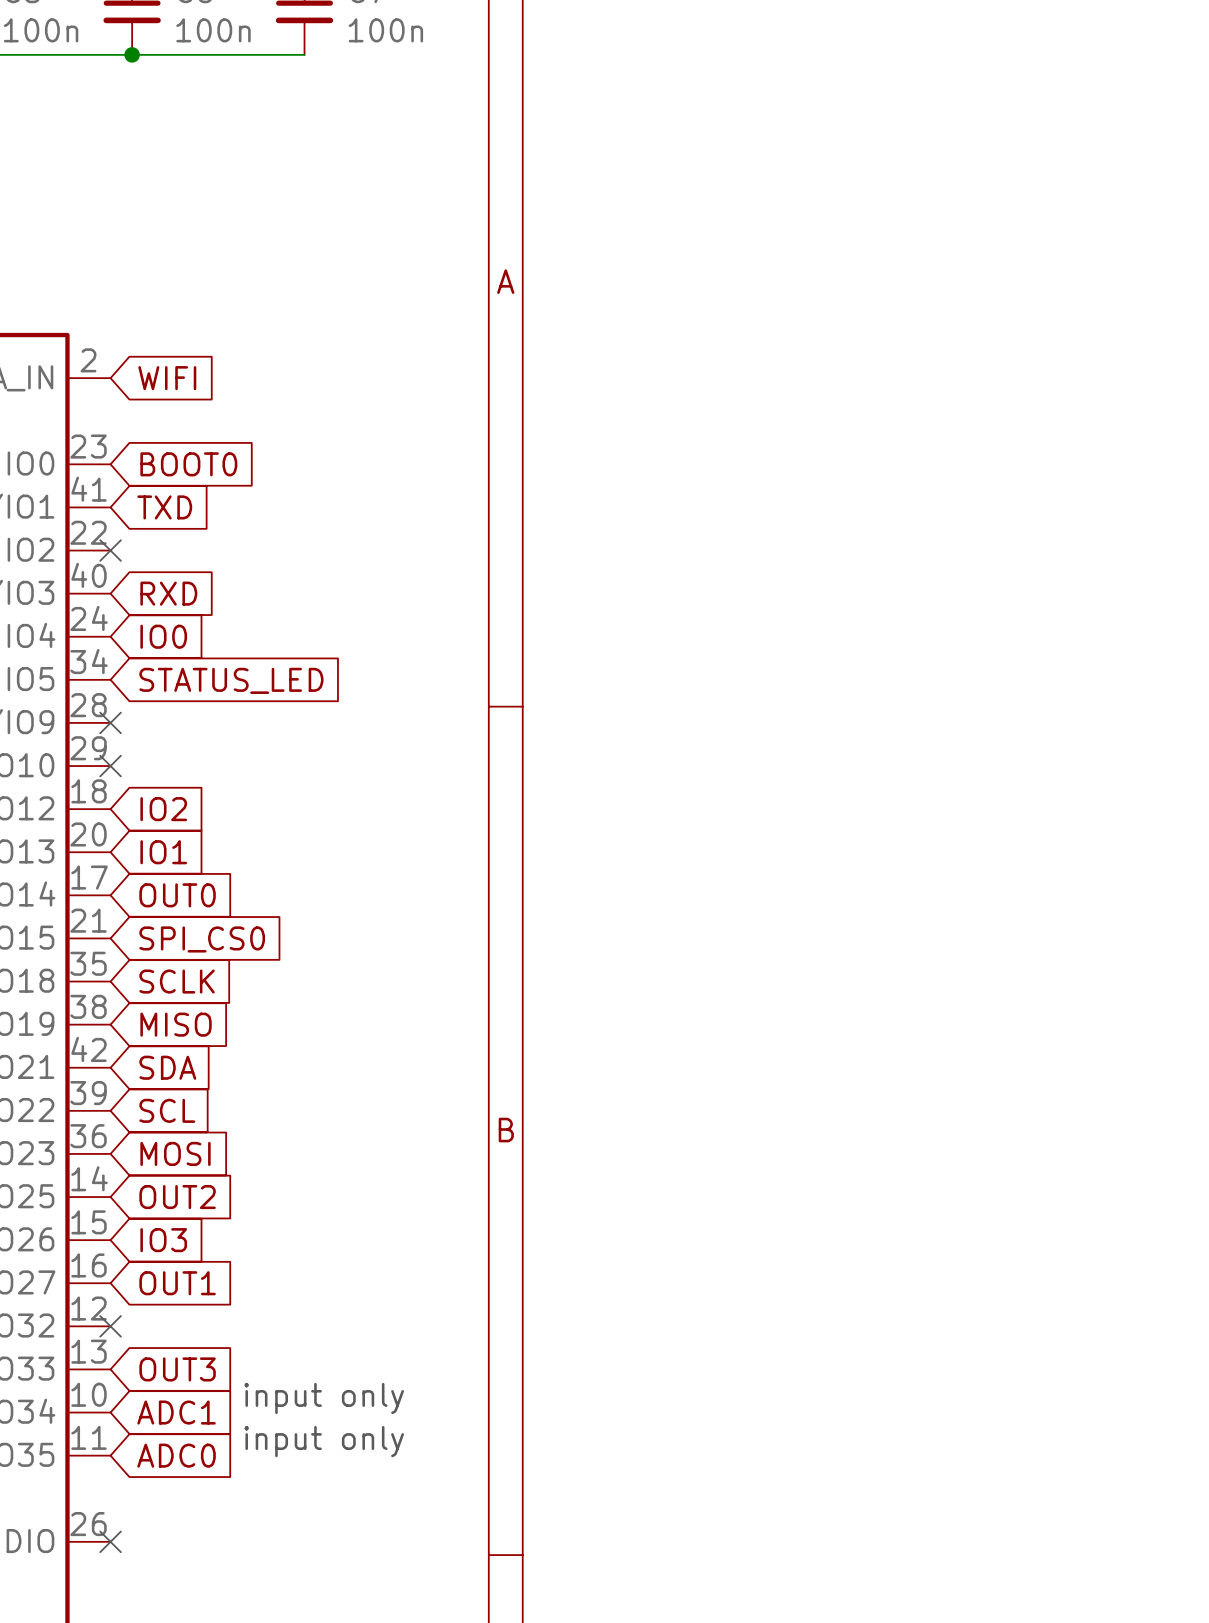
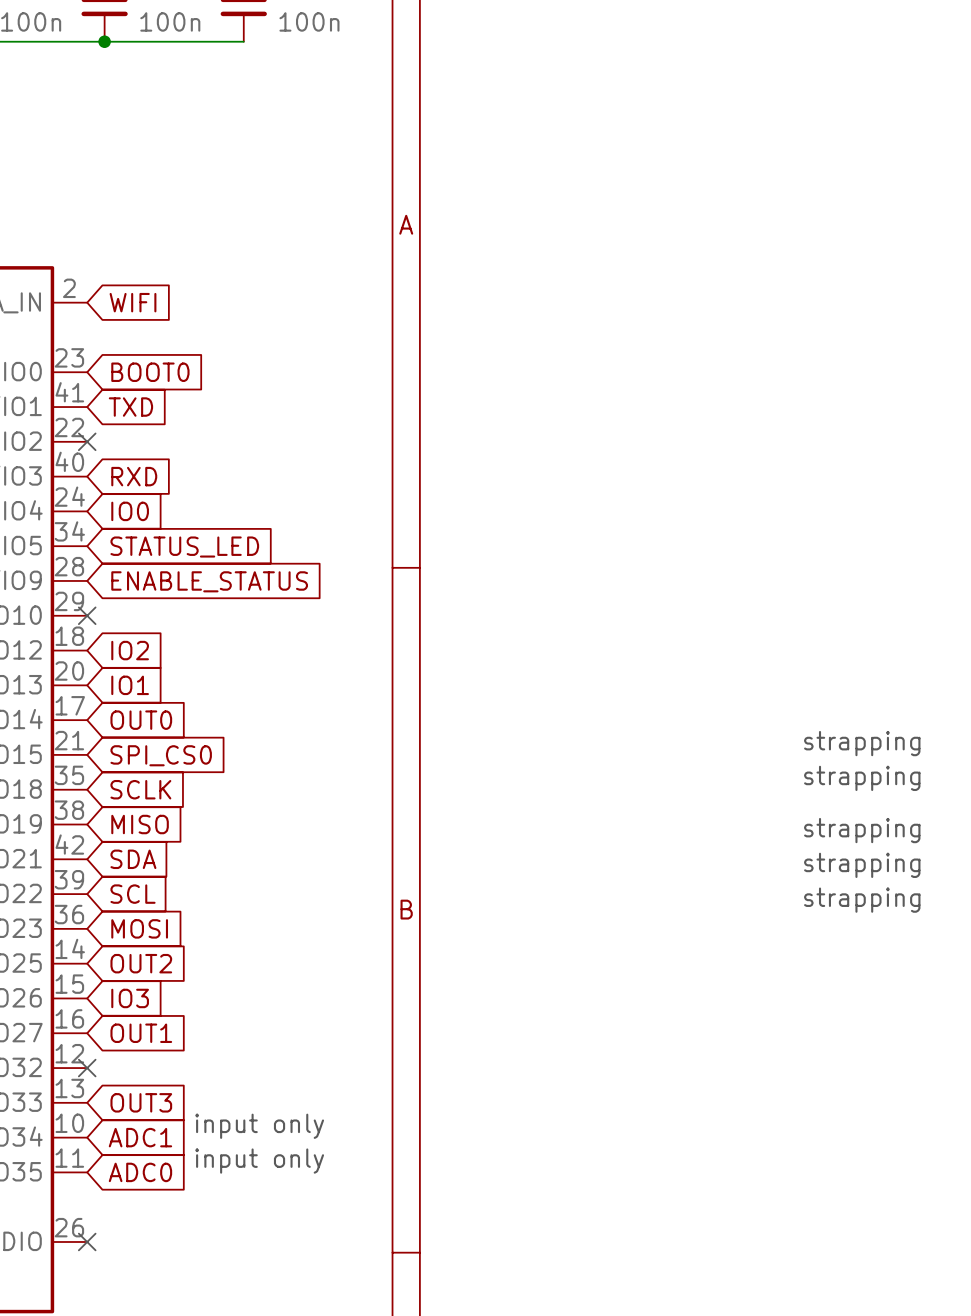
no-connect mark: (110, 722) -> none
global label: none -> ENABLE_STATUS (209, 581)
text: none -> strapping (862, 743)
text: none -> strapping (862, 778)
text: none -> strapping (862, 830)
text: none -> strapping (862, 865)
text: none -> strapping (862, 900)

